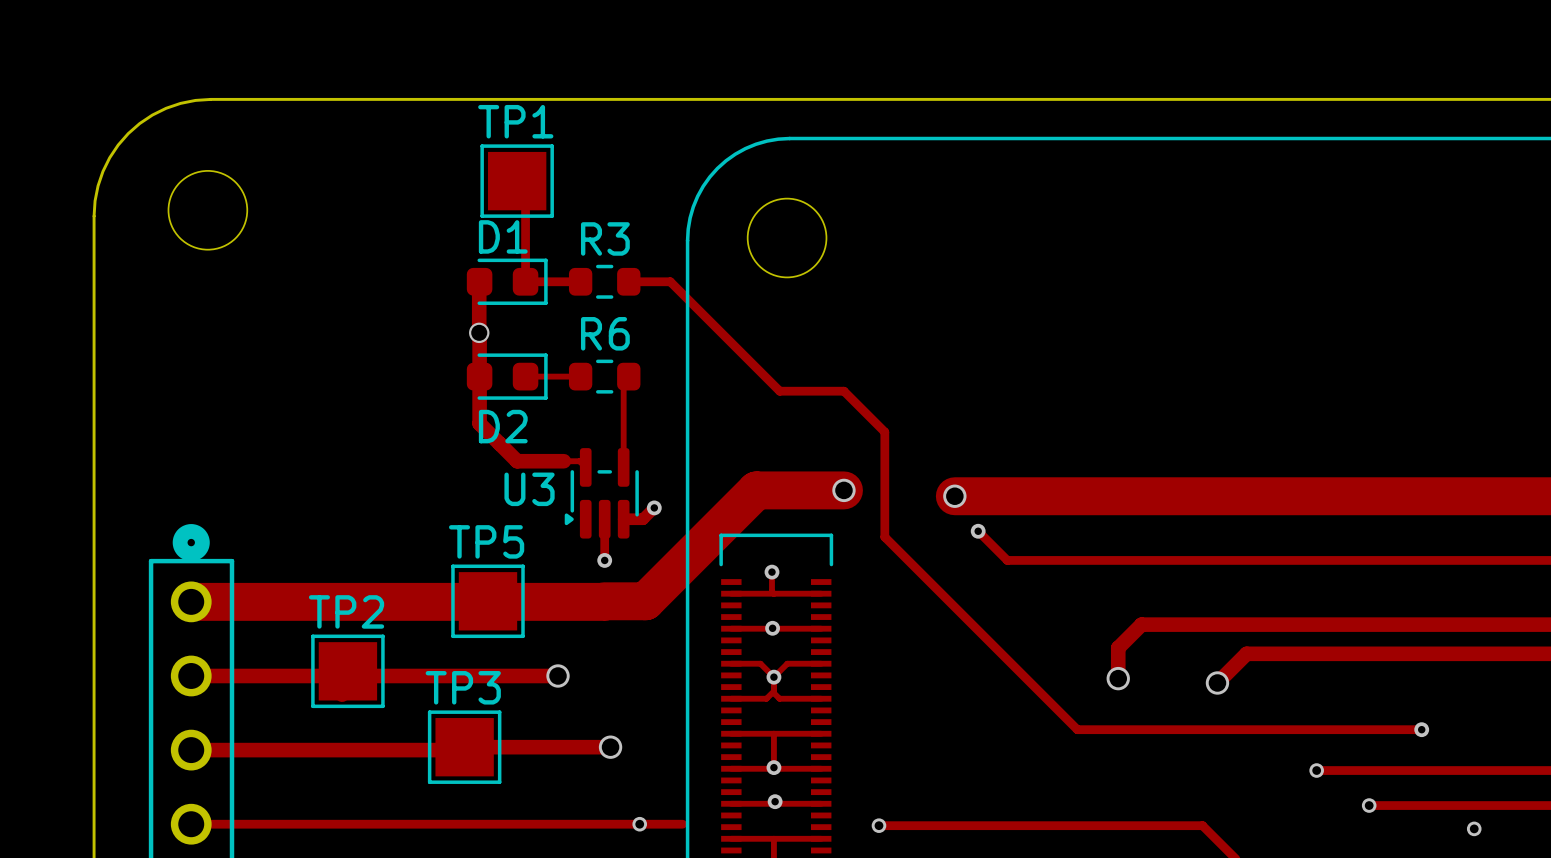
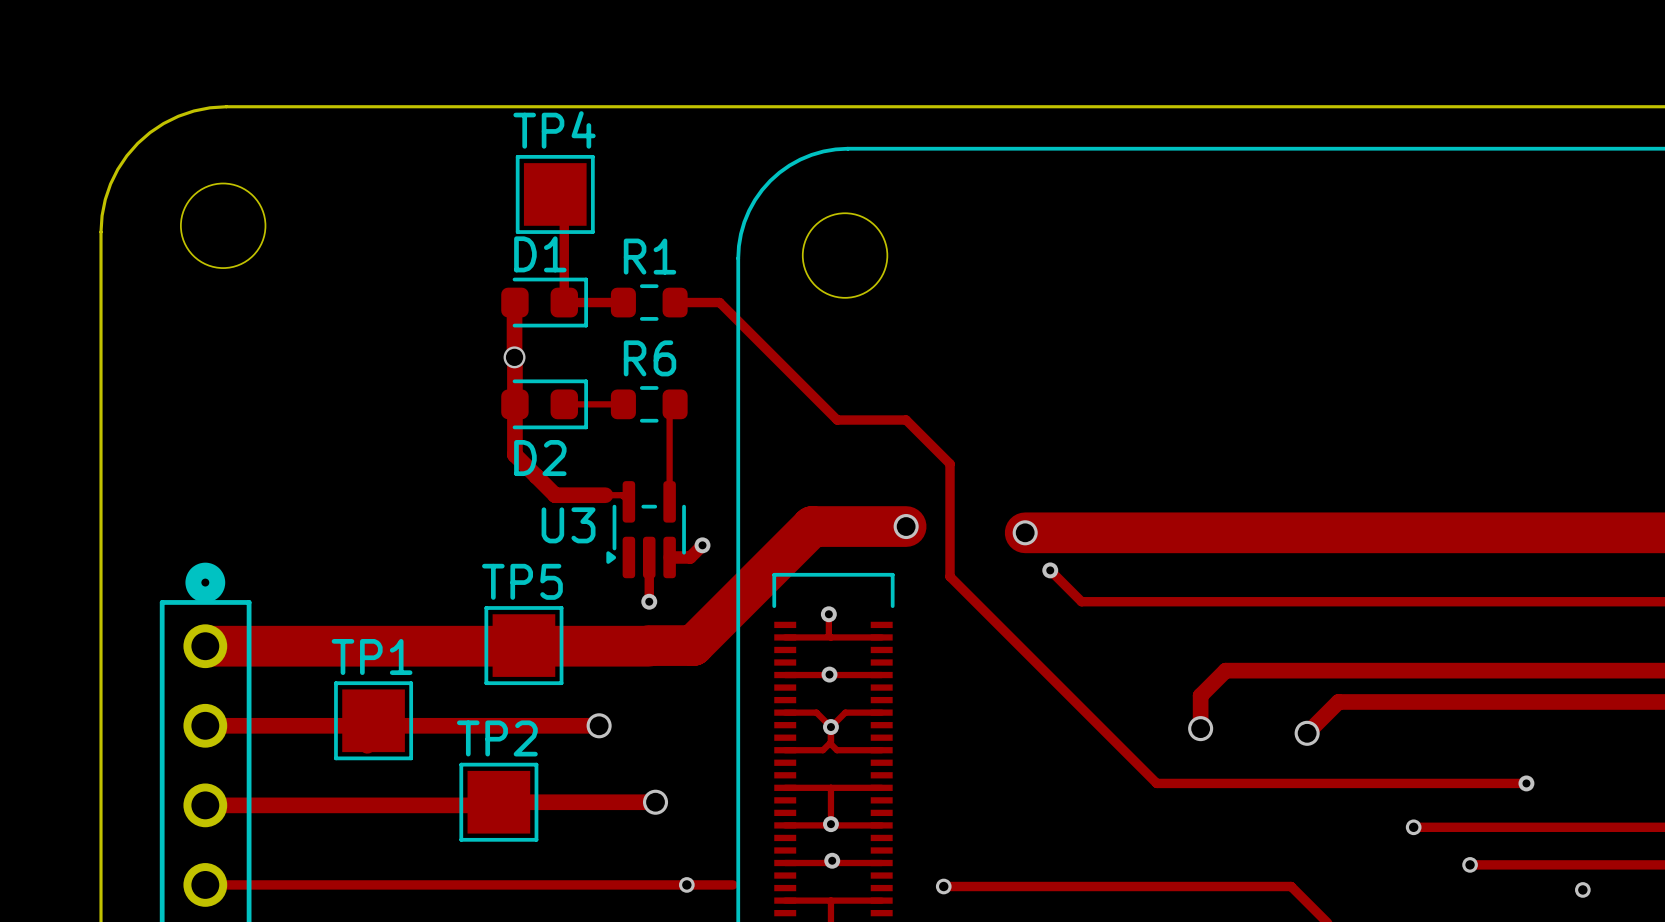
TP1 name: TP1 (515, 121) -> TP4 (554, 129)
R3 name: R3 (605, 238) -> R1 (650, 256)
TP2 name: TP2 (346, 611) -> TP1 (372, 657)
TP3 name: TP3 (463, 687) -> TP2 (497, 738)

